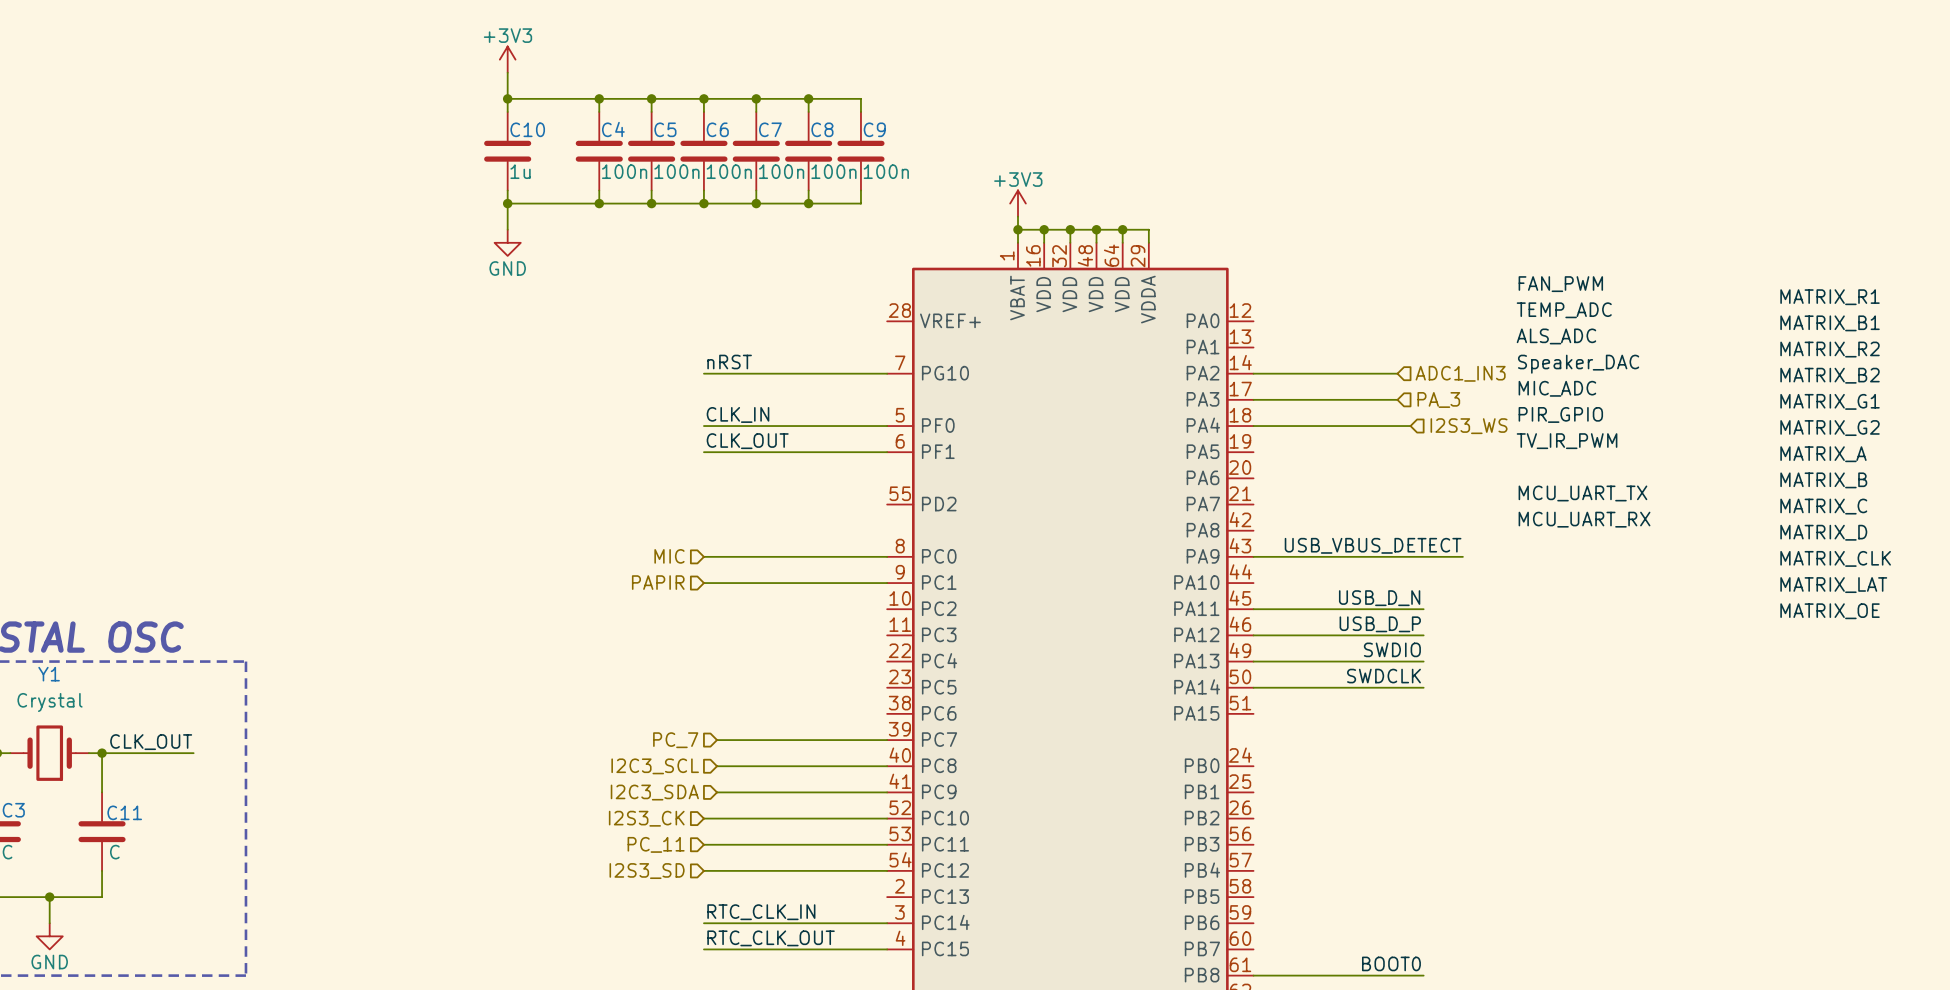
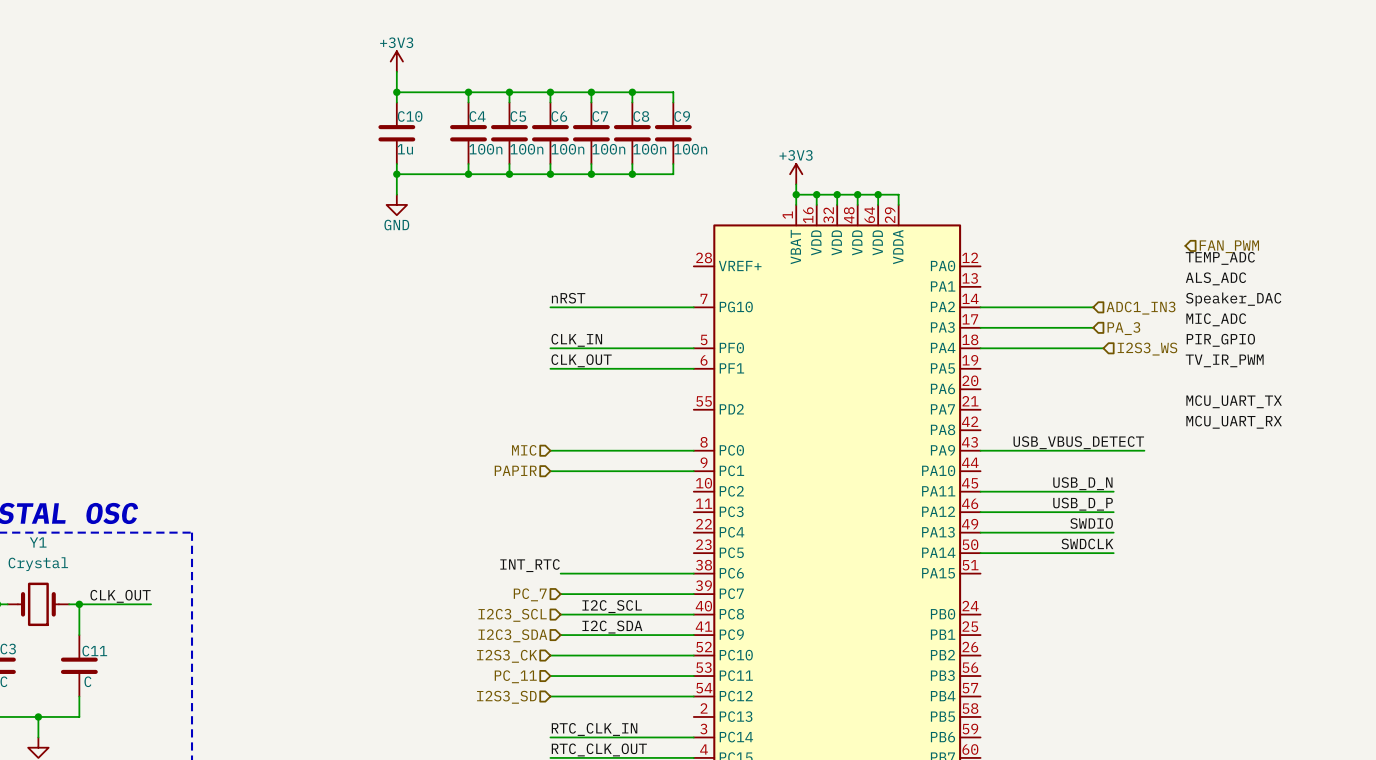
label: FAN_PWM (1560, 284) -> none
hierarchical label: none -> FAN_PWM (1229, 246)
label: none -> INT_RTC (530, 565)
wire: none -> (560, 573) (693, 573)
label: none -> I2C_SCL (612, 606)
label: none -> I2C_SDA (612, 627)

